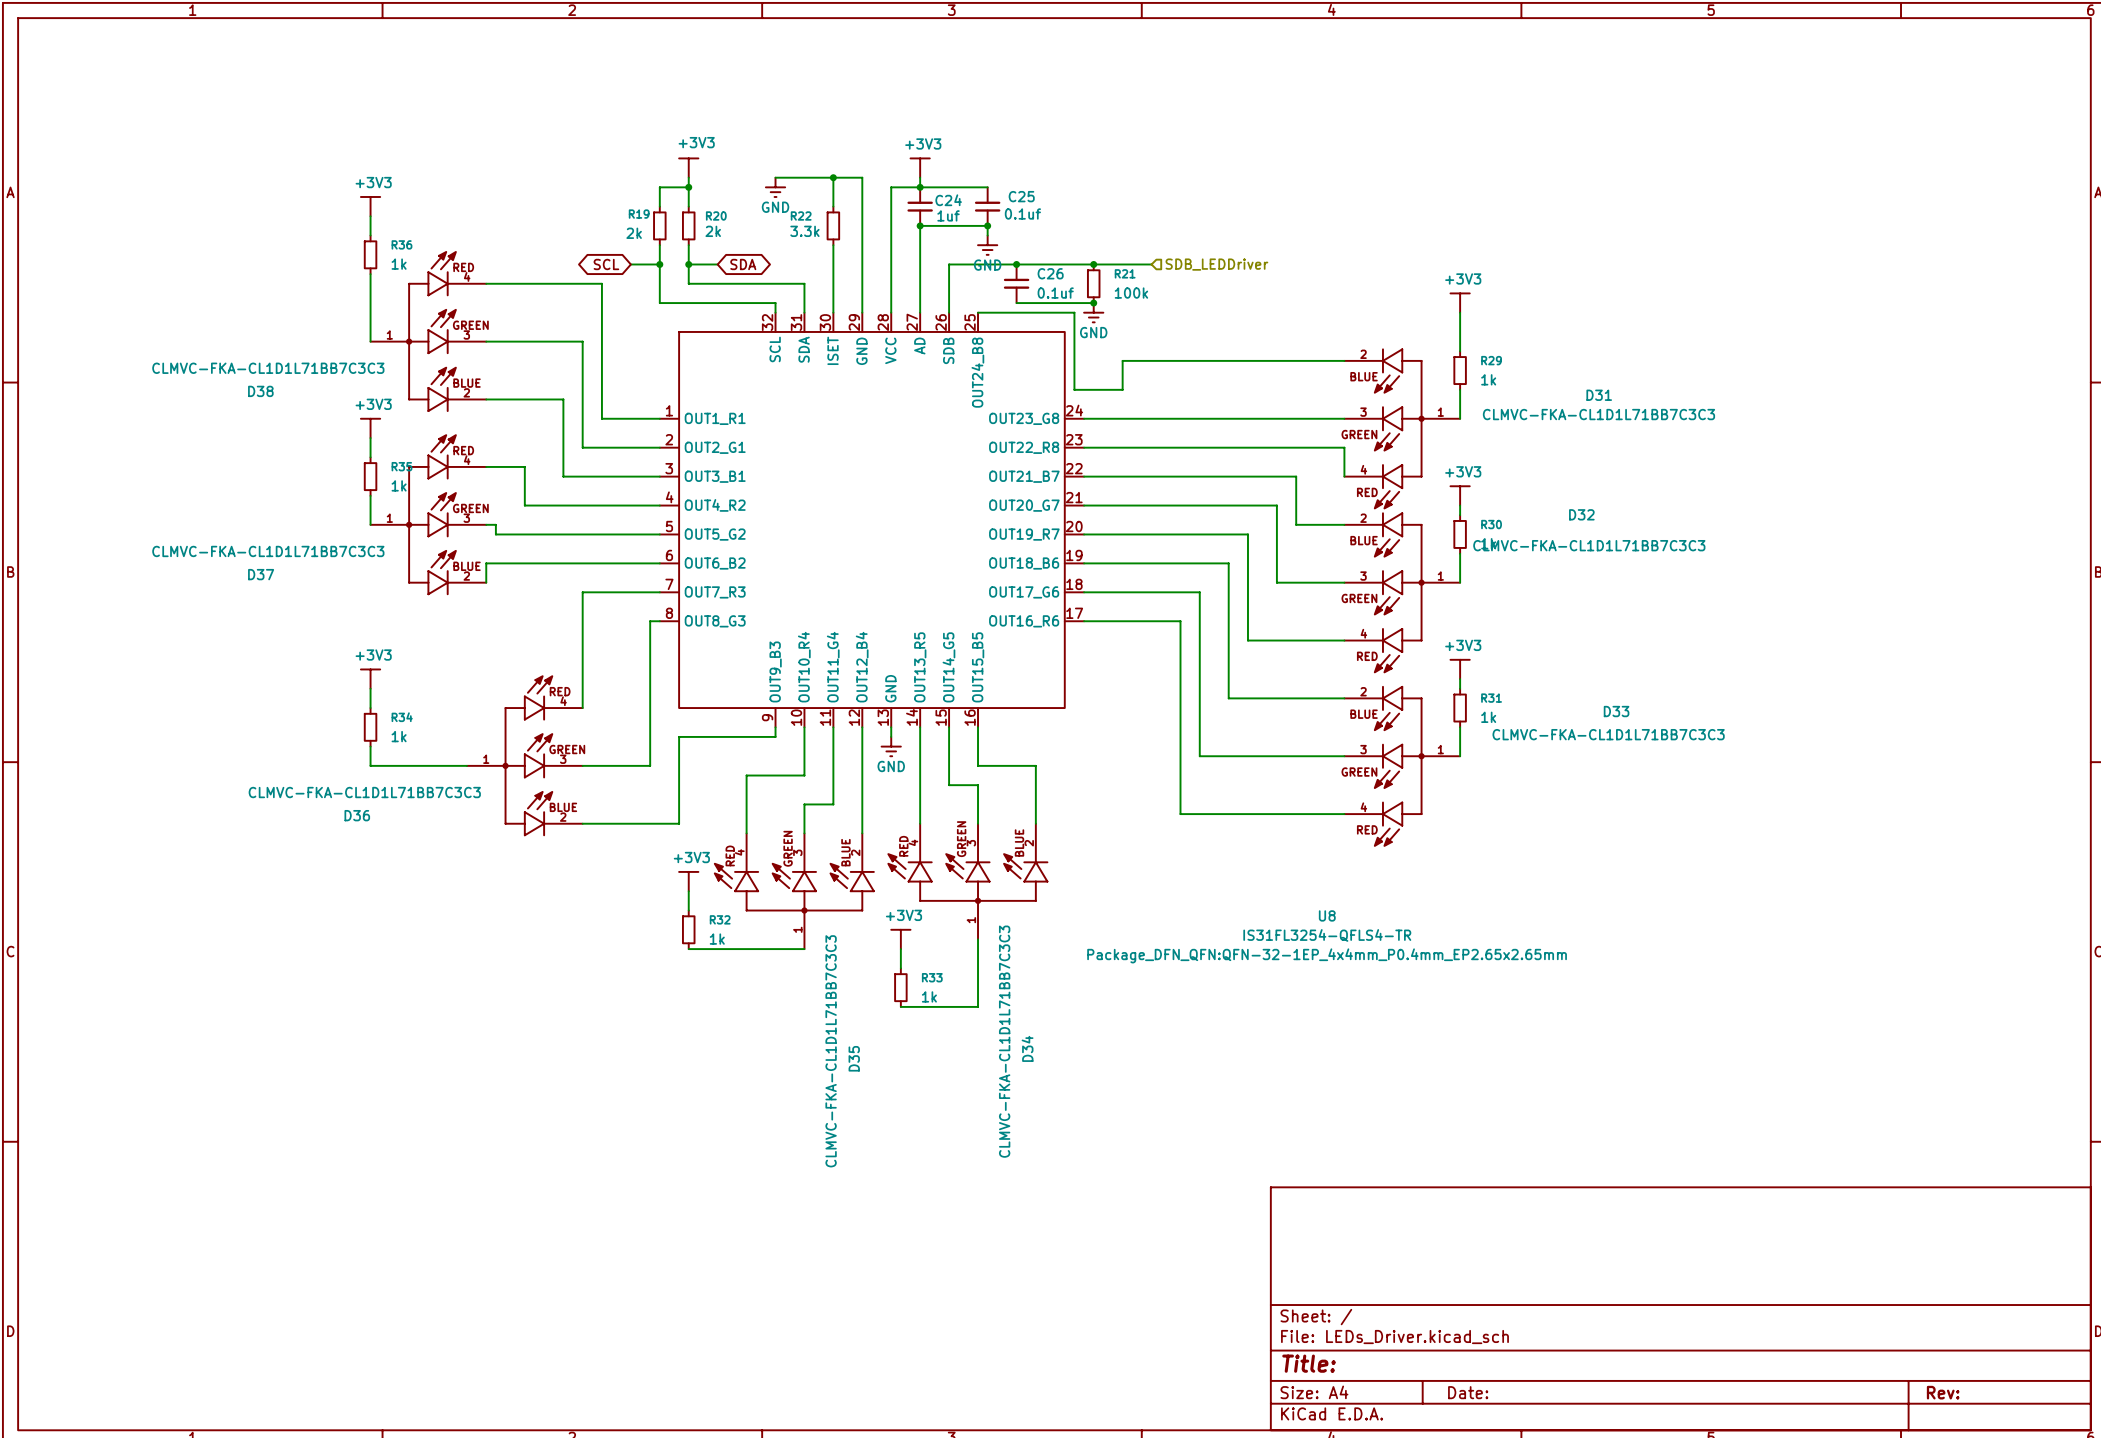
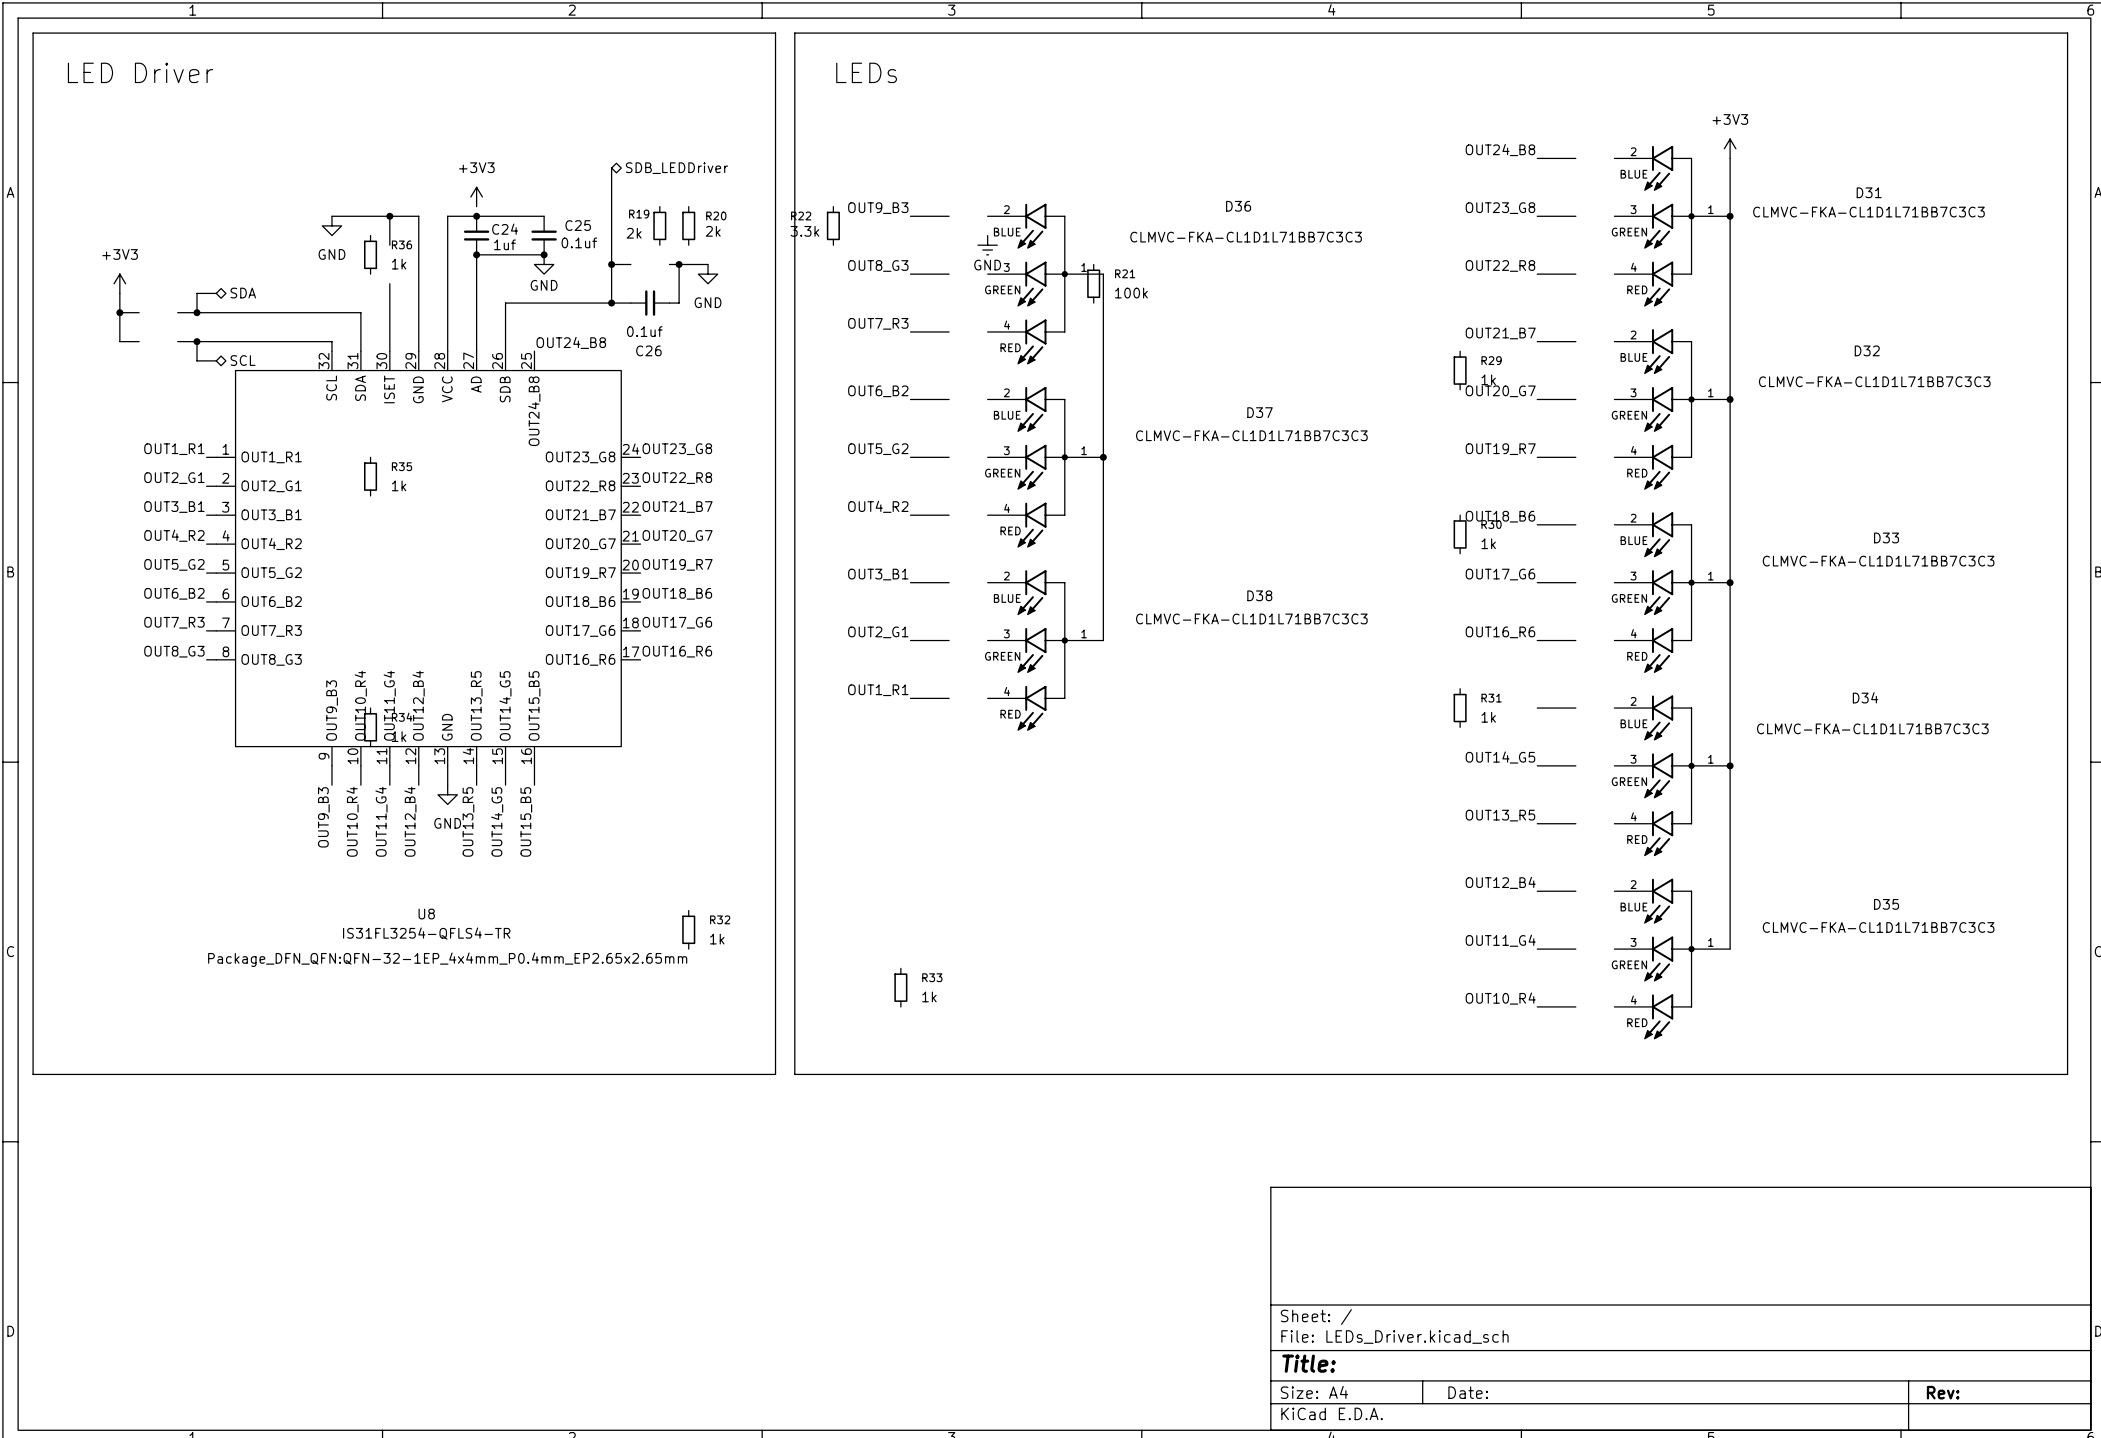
line: none -> (33, 33) (775, 33) (775, 1074) (33, 1074) (33, 33)
line: none -> (794, 33) (2067, 33) (2067, 1074) (794, 1074) (794, 33)
text: none -> LED Driver (140, 72)
text: none -> LEDs (866, 72)
power symbol: none -> +3V3 (1730, 148)
label: none -> OUT24_B8 (1500, 150)
wire: none -> (1537, 158) (1575, 158)
wire: none -> (1730, 158) (1730, 949)
wire: none -> (611, 168) (611, 303)
hierarchical label: none -> SDB_LEDDriver (676, 168)
power symbol: +3V3 (688, 168) -> none
power symbol: +3V3 (920, 168) -> none
wire: (688, 177) (688, 206) -> none
wire: (775, 177) (862, 177) (862, 312) -> none
wire: (833, 177) (833, 206) -> none
junction: (833, 177) -> none
wire: (920, 177) (920, 187) -> none
wire: (688, 187) (659, 187) (659, 206) -> none
junction: (688, 187) -> none
power symbol: GND (775, 187) -> none
junction: (920, 187) -> none
wire: (987, 187) (891, 187) (891, 312) -> none
power symbol: none -> +3V3 (476, 196)
power symbol: +3V3 (370, 206) -> none
C24 position: (920, 206) -> (476, 235)
C25 position: (987, 206) -> (544, 235)
label: none -> OUT9_B3 (878, 208)
label: none -> OUT23_G8 (1500, 208)
wire: none -> (331, 216) (418, 216) (418, 351)
wire: (370, 216) (370, 235) -> none
wire: none -> (389, 216) (389, 245)
junction: none -> (389, 216)
junction: none -> (476, 216)
wire: none -> (544, 216) (447, 216) (447, 351)
wire: none -> (910, 216) (949, 216)
wire: none -> (1537, 216) (1575, 216)
junction: none -> (1730, 216)
power symbol: none -> GND (331, 225)
junction: (920, 225) -> none
junction: (987, 225) -> none
wire: (987, 235) (987, 225) (920, 225) (920, 312) -> none
wire: (659, 245) (659, 303) (669, 303) -> none
wire: (688, 245) (688, 283) (804, 283) (804, 312) -> none
wire: (833, 245) (833, 312) -> none
junction: none -> (476, 254)
wire: none -> (544, 254) (476, 254) (476, 351)
junction: none -> (544, 254)
power symbol: none -> GND (544, 264)
global label: SCL (606, 264) -> none
junction: none -> (611, 264)
wire: (630, 264) (659, 264) -> (630, 264) (611, 264)
junction: (659, 264) -> none
wire: none -> (669, 264) (688, 264)
junction: none -> (679, 264)
junction: (688, 264) -> none
wire: (708, 264) (717, 264) -> none
global label: SDA (743, 264) -> none
junction: (1016, 264) -> none
junction: (1093, 264) -> none
wire: (1151, 264) (949, 264) (949, 312) -> none
hierarchical label: SDB_LEDDriver (1216, 264) -> none
label: none -> OUT8_G3 (878, 265)
label: none -> OUT22_R8 (1500, 265)
C26 name position: C26 (1050, 273) -> C26 (648, 350)
wire: (370, 274) (370, 341) -> (389, 283) (389, 351)
power symbol: none -> GND (708, 274)
wire: none -> (910, 274) (949, 274)
wire: none -> (1103, 274) (1103, 640)
wire: none -> (1537, 274) (1575, 274)
power symbol: none -> +3V3 (119, 283)
wire: (486, 283) (601, 283) (601, 418) (659, 418) -> none
C26 rotation: 0° (1016, 283) -> 90° clockwise (650, 303)
C26 position: (1016, 283) -> (650, 303)
wire: none -> (119, 293) (119, 341) (139, 341)
wire: none -> (216, 293) (196, 293) (196, 312)
hierarchical label: none -> SDA (243, 293)
C26 value position: 0.1uf (1055, 293) -> 0.1uf (644, 331)
junction: none -> (611, 303)
wire: none -> (630, 303) (505, 303) (505, 351)
wire: (679, 303) (775, 303) (775, 312) -> (679, 303) (679, 264)
wire: (1016, 303) (1093, 303) -> none
junction: (1093, 303) -> none
power symbol: +3V3 (1460, 303) -> none
wire: none -> (119, 312) (139, 312)
junction: none -> (119, 312)
wire: none -> (177, 312) (360, 312) (360, 351)
junction: none -> (196, 312)
wire: (978, 312) (1074, 312) (1074, 389) (1122, 389) (1122, 360) (1344, 360) -> none
power symbol: GND (1093, 312) -> none
wire: (1460, 312) (1460, 351) -> none
label: none -> OUT7_R3 (878, 323)
D38 position: (428, 331) -> (1045, 650)
D38 rotation: 0° (431, 331) -> 180° (1042, 650)
label: none -> OUT21_B7 (1500, 333)
wire: none -> (177, 341) (331, 341) (331, 351)
wire: none -> (196, 341) (196, 360) (216, 360)
junction: none -> (196, 341)
wire: (486, 341) (582, 341) (582, 447) (659, 447) -> none
wire: none -> (1537, 341) (1575, 341)
label: none -> OUT24_B8 (571, 342)
hierarchical label: none -> SCL (243, 360)
D38 value position: CLMVC-FKA-CL1D1L71BB7C3C3 (268, 368) -> CLMVC-FKA-CL1D1L71BB7C3C3 (1251, 618)
wire: (1460, 389) (1460, 418) -> none
D38 name position: D38 (260, 391) -> D38 (1259, 595)
label: none -> OUT6_B2 (878, 391)
label: none -> OUT20_G7 (1500, 391)
wire: (486, 399) (563, 399) (563, 476) (659, 476) -> none
wire: none -> (910, 399) (949, 399)
wire: none -> (1537, 399) (1575, 399)
junction: none -> (1730, 399)
wire: (1084, 418) (1344, 418) -> none
power symbol: +3V3 (370, 428) -> none
D31 position: (1402, 428) -> (1672, 226)
wire: (370, 438) (370, 457) -> none
wire: (1084, 447) (1344, 447) (1344, 476) -> none
label: none -> OUT1_R1 (174, 449)
label: none -> OUT23_G8 (677, 449)
label: none -> OUT5_G2 (878, 449)
label: none -> OUT19_R7 (1500, 449)
wire: none -> (206, 457) (216, 457)
wire: none -> (910, 457) (949, 457)
junction: none -> (1103, 457)
wire: none -> (1537, 457) (1575, 457)
wire: (486, 466) (524, 466) (524, 505) (659, 505) -> none
wire: (1084, 476) (1296, 476) (1296, 524) (1344, 524) -> none
label: none -> OUT2_G1 (174, 478)
label: none -> OUT22_R8 (677, 478)
wire: none -> (206, 486) (216, 486)
wire: (370, 495) (370, 524) -> none
power symbol: +3V3 (1460, 495) -> none
wire: (1084, 505) (1276, 505) (1276, 582) (1344, 582) -> none
wire: (1460, 505) (1460, 515) -> none
label: none -> OUT4_R2 (878, 506)
label: none -> OUT3_B1 (174, 507)
label: none -> OUT21_B7 (677, 507)
D37 position: (428, 514) -> (1045, 467)
D37 rotation: 0° (431, 514) -> 180° (1042, 467)
D32 name position: D32 (1581, 514) -> D32 (1867, 350)
wire: none -> (206, 515) (216, 515)
wire: none -> (910, 515) (949, 515)
label: none -> OUT18_B6 (1500, 516)
U8 position: (871, 520) -> (428, 558)
wire: (486, 524) (495, 524) (495, 534) (659, 534) -> none
wire: none -> (1537, 524) (1575, 524)
wire: (1084, 534) (1247, 534) (1247, 640) (1344, 640) -> none
label: none -> OUT4_R2 (174, 535)
label: none -> OUT20_G7 (677, 535)
wire: none -> (206, 544) (216, 544)
D32 value position: CLMVC-FKA-CL1D1L71BB7C3C3 (1589, 545) -> CLMVC-FKA-CL1D1L71BB7C3C3 (1874, 381)
D37 value position: CLMVC-FKA-CL1D1L71BB7C3C3 (268, 551) -> CLMVC-FKA-CL1D1L71BB7C3C3 (1251, 435)
wire: (1460, 553) (1460, 582) -> none
wire: (659, 563) (486, 563) (486, 582) -> none
wire: (1084, 563) (1228, 563) (1228, 698) (1344, 698) -> none
label: none -> OUT5_G2 (174, 564)
label: none -> OUT19_R7 (677, 564)
wire: none -> (206, 573) (216, 573)
D37 name position: D37 (261, 574) -> D37 (1260, 412)
label: none -> OUT3_B1 (878, 574)
label: none -> OUT17_G6 (1500, 574)
wire: none -> (910, 582) (949, 582)
wire: none -> (1537, 582) (1575, 582)
junction: none -> (1730, 582)
wire: (659, 592) (582, 592) (582, 708) -> none
wire: (1084, 592) (1199, 592) (1199, 756) (1344, 756) -> none
D32 position: (1402, 592) -> (1672, 409)
label: none -> OUT6_B2 (174, 593)
label: none -> OUT18_B6 (677, 593)
wire: none -> (206, 601) (216, 601)
wire: (659, 621) (650, 621) (650, 765) (582, 765) -> none
wire: (1084, 621) (1180, 621) (1180, 814) (1344, 814) -> none
label: none -> OUT7_R3 (174, 622)
label: none -> OUT17_G6 (677, 622)
wire: none -> (206, 630) (216, 630)
label: none -> OUT2_G1 (878, 632)
label: none -> OUT16_R6 (1500, 632)
wire: none -> (910, 640) (949, 640)
wire: none -> (1537, 640) (1575, 640)
label: none -> OUT8_G3 (174, 651)
label: none -> OUT16_R6 (677, 651)
wire: none -> (206, 659) (216, 659)
power symbol: +3V3 (1460, 669) -> none
power symbol: +3V3 (370, 679) -> none
wire: (1460, 679) (1460, 688) -> none
wire: (370, 688) (370, 708) -> (360, 765) (360, 785)
label: none -> OUT1_R1 (878, 690)
wire: none -> (910, 698) (949, 698)
wire: none -> (1537, 708) (1575, 708)
wire: (775, 727) (775, 736) (679, 736) (679, 823) (582, 823) -> none
wire: (804, 727) (804, 775) (746, 775) (746, 833) -> none
wire: (833, 727) (833, 804) (804, 804) (804, 833) -> none
wire: (862, 727) (862, 833) -> none
wire: (891, 727) (891, 736) -> none
wire: (920, 727) (920, 823) -> none
wire: (949, 727) (949, 785) (978, 785) (978, 823) -> none
wire: (978, 727) (978, 765) (1035, 765) (1035, 823) -> none
wire: (1460, 727) (1460, 756) -> none
wire: (370, 746) (370, 765) (466, 765) -> none
power symbol: GND (891, 746) -> none
D36 position: (524, 755) -> (1045, 284)
D36 rotation: 0° (527, 755) -> 180° (1042, 284)
label: none -> OUT14_G5 (1500, 757)
wire: none -> (331, 765) (331, 785)
wire: none -> (389, 765) (389, 785)
wire: none -> (418, 765) (418, 785)
wire: none -> (447, 765) (447, 785)
wire: none -> (476, 765) (476, 785)
wire: none -> (534, 765) (534, 785)
wire: none -> (1537, 765) (1575, 765)
junction: none -> (1730, 765)
D33 position: (1402, 766) -> (1672, 592)
D36 value position: CLMVC-FKA-CL1D1L71BB7C3C3 (364, 792) -> CLMVC-FKA-CL1D1L71BB7C3C3 (1246, 237)
power symbol: none -> GND (447, 794)
D36 name position: D36 (357, 815) -> D36 (1238, 206)
label: none -> OUT13_R5 (1500, 815)
label: none -> OUT9_B3 (323, 817)
label: none -> OUT10_R4 (352, 821)
label: none -> OUT11_G4 (381, 821)
label: none -> OUT12_B4 (410, 821)
label: none -> OUT13_R5 (468, 821)
label: none -> OUT14_G5 (497, 821)
label: none -> OUT15_B5 (526, 821)
wire: none -> (1537, 823) (1575, 823)
D34 rotation: 0° (968, 878) -> 90° counterclockwise (1669, 775)
power symbol: +3V3 (688, 881) -> none
D34 position: (968, 881) -> (1672, 775)
label: none -> OUT12_B4 (1500, 882)
D35 rotation: 0° (794, 888) -> 90° counterclockwise (1669, 959)
wire: (688, 891) (688, 910) -> none
D35 position: (794, 891) -> (1672, 959)
wire: none -> (1537, 891) (1575, 891)
U8 name position: U8 (1327, 915) -> U8 (426, 914)
U8 value position: IS31FL3254-QFLS4-TR (1327, 935) -> IS31FL3254-QFLS4-TR (426, 933)
power symbol: +3V3 (900, 939) -> none
wire: (978, 939) (978, 1006) (900, 1006) -> none
label: none -> OUT11_G4 (1500, 940)
wire: (688, 949) (804, 949) -> none
wire: (900, 949) (900, 968) -> none
wire: none -> (1537, 949) (1575, 949)
U8 text position: Package_DFN_QFN:QFN-32-1EP_4x4mm_P0.4mm_EP2.65x2.65mm (1327, 955) -> Package_DFN_QFN:QFN-32-1EP_4x4mm_P0.4mm_EP2.65x2.65mm (447, 959)
label: none -> OUT10_R4 (1500, 998)
wire: none -> (1537, 1006) (1575, 1006)
D34 value position: CLMVC-FKA-CL1D1L71BB7C3C3 (1004, 1041) -> CLMVC-FKA-CL1D1L71BB7C3C3 (1872, 728)
D34 name position: D34 (1027, 1048) -> D34 (1865, 697)
D35 value position: CLMVC-FKA-CL1D1L71BB7C3C3 (831, 1051) -> CLMVC-FKA-CL1D1L71BB7C3C3 (1878, 927)
D35 name position: D35 (854, 1058) -> D35 (1886, 904)

